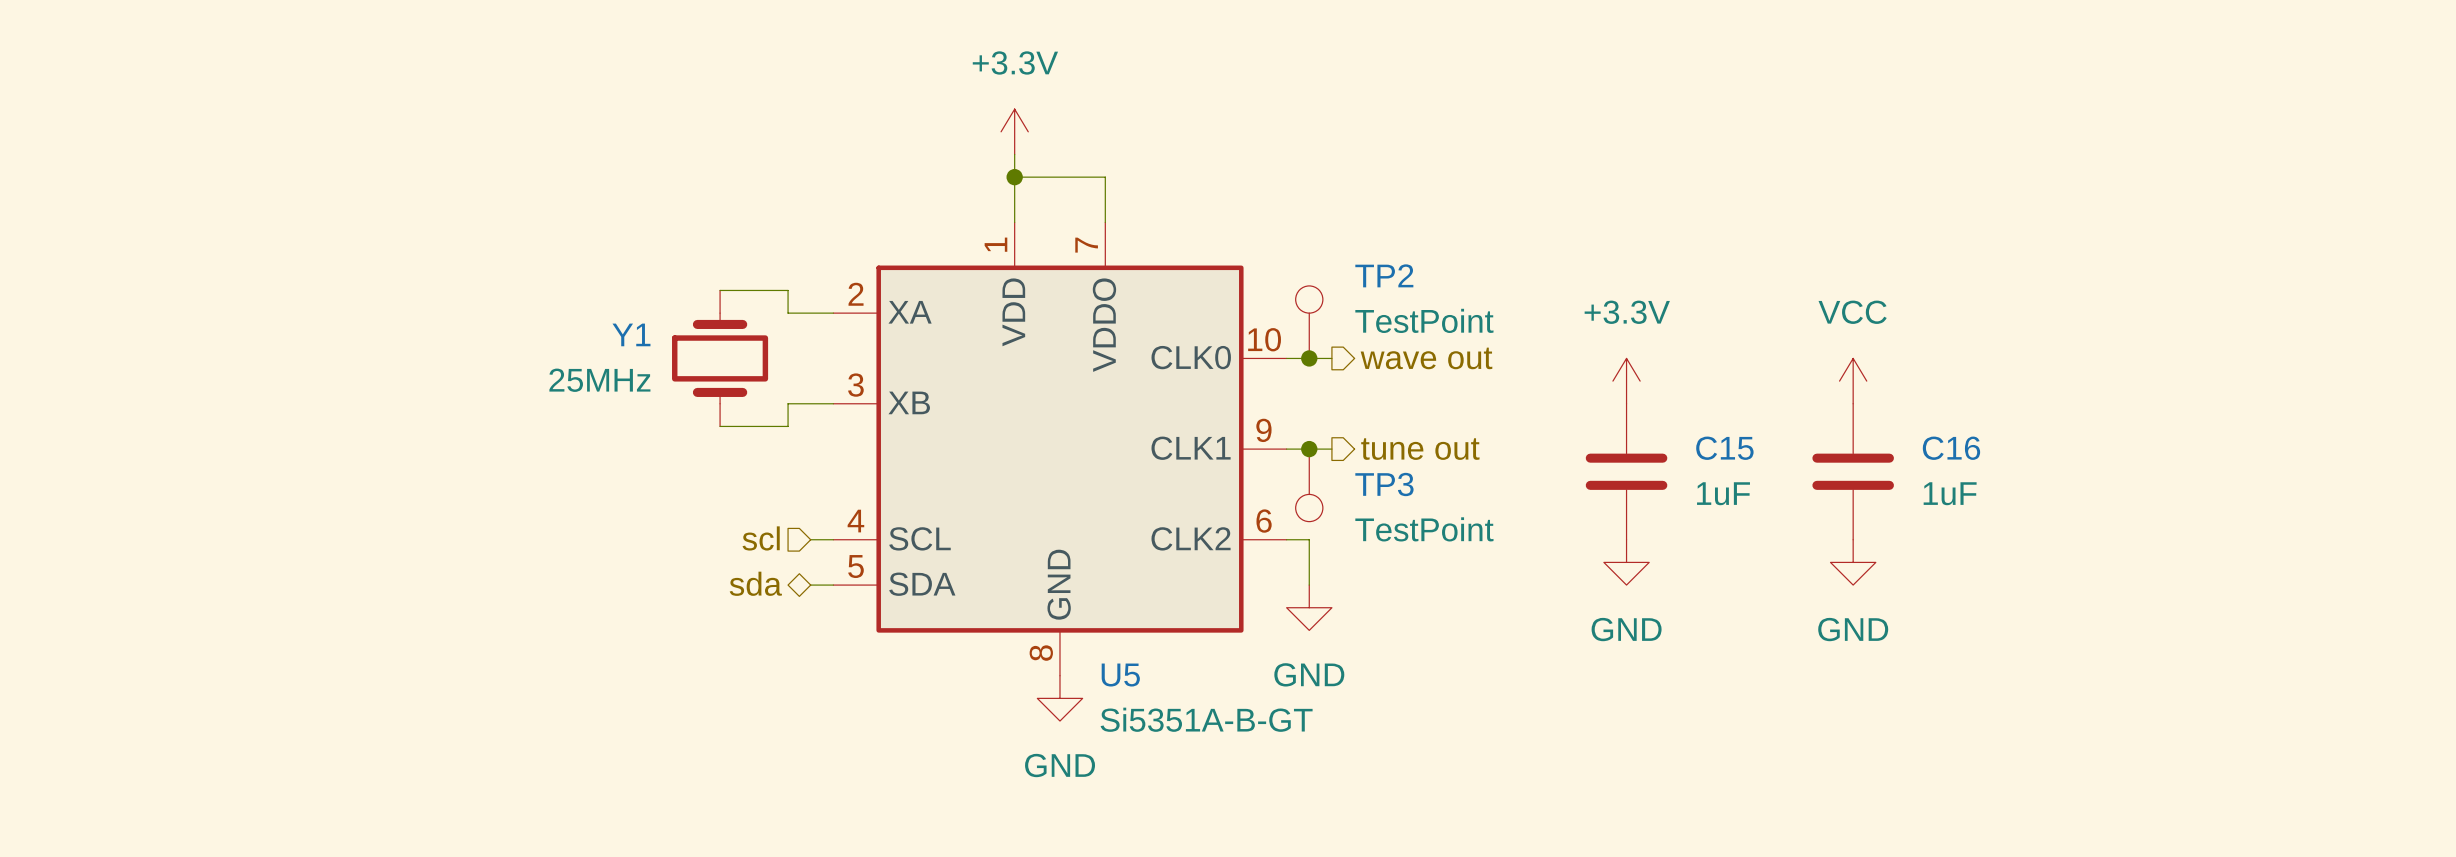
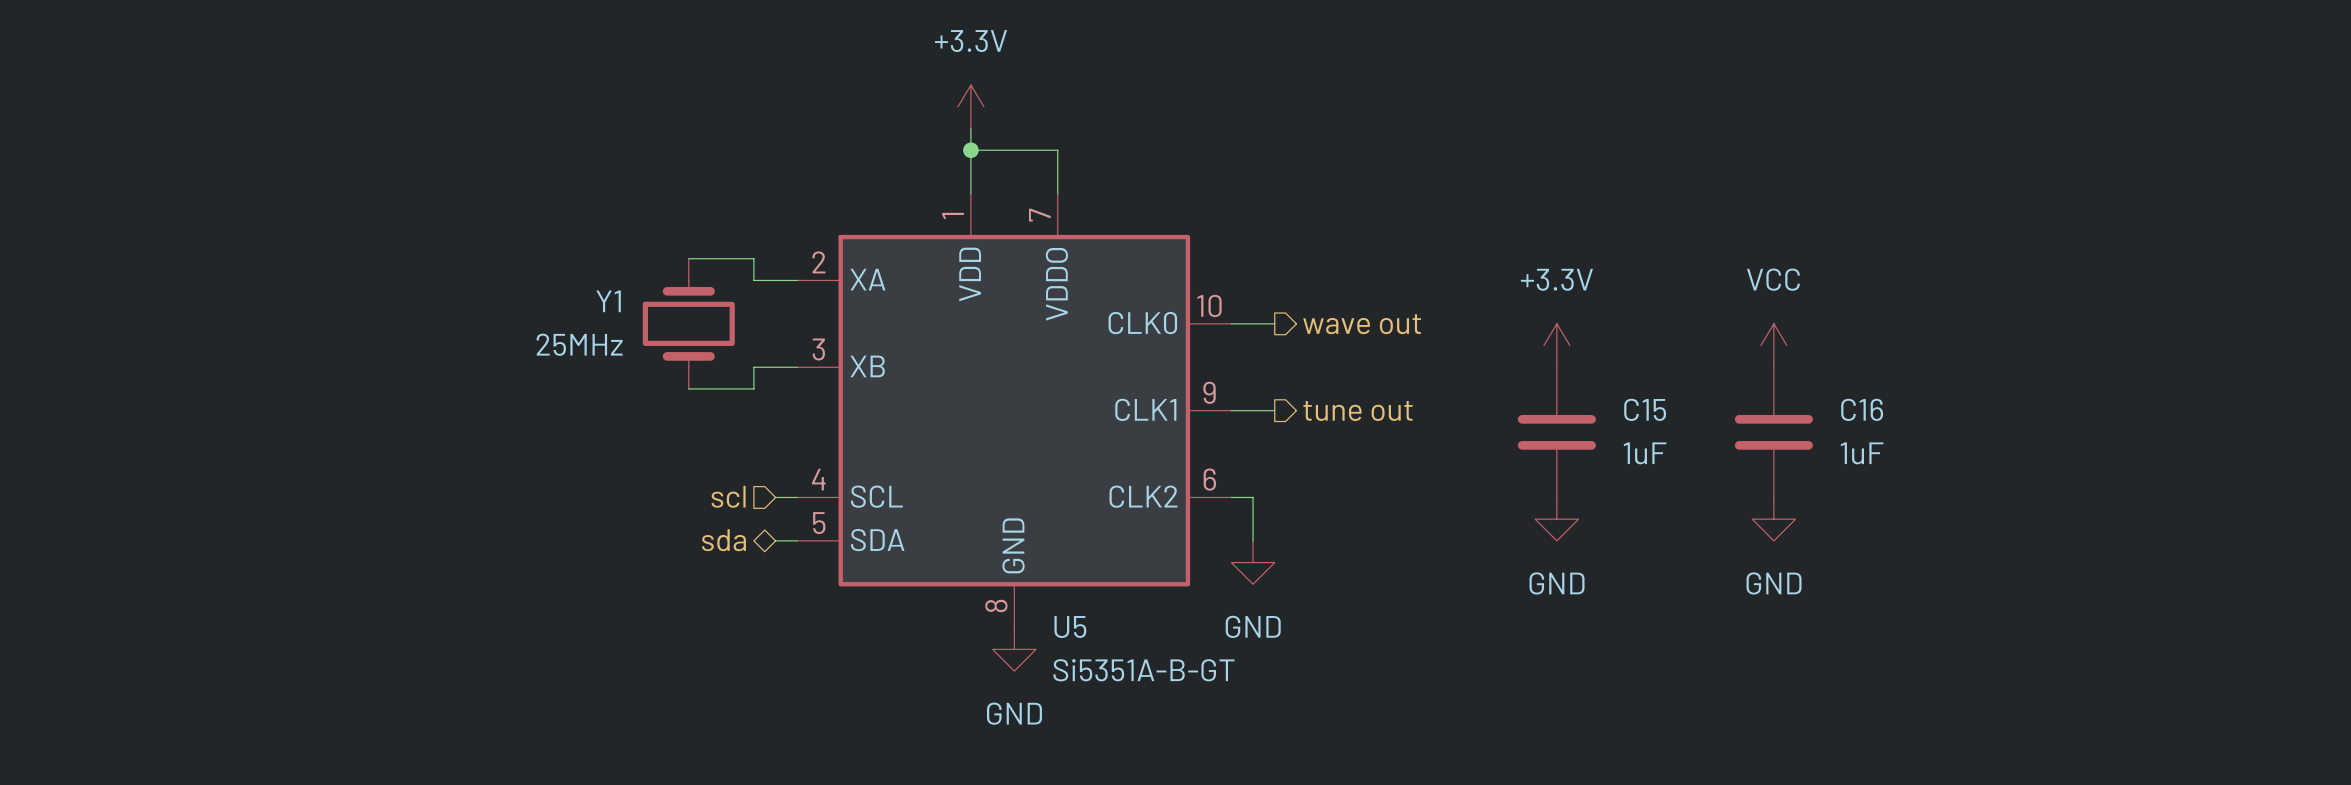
TP2: TestPoint (1309, 322) -> none
junction: (1309, 358) -> none
junction: (1309, 449) -> none
TP3: TestPoint (1309, 485) -> none

